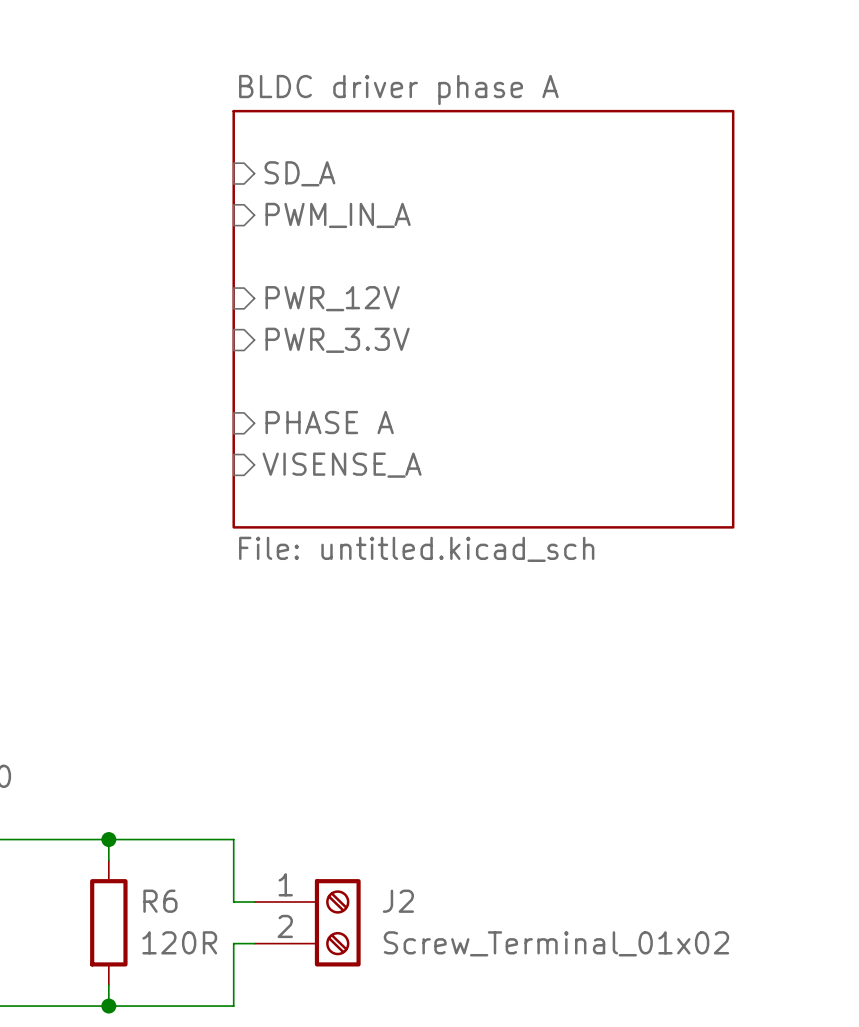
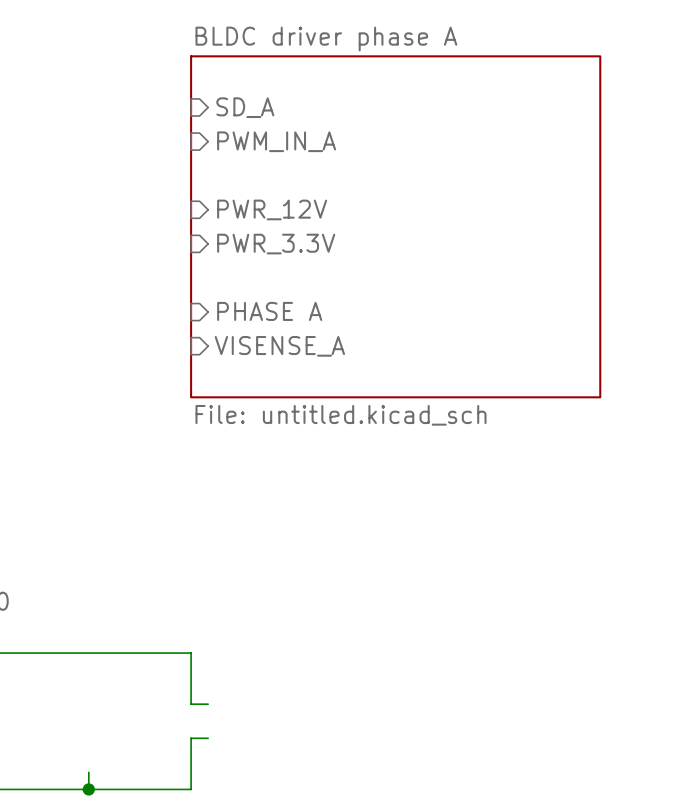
wire: (108, 839) (108, 860) -> none
junction: (108, 839) -> none
R6: 120R (108, 922) -> none
J2: Screw_Terminal_01x02 (307, 922) -> none

